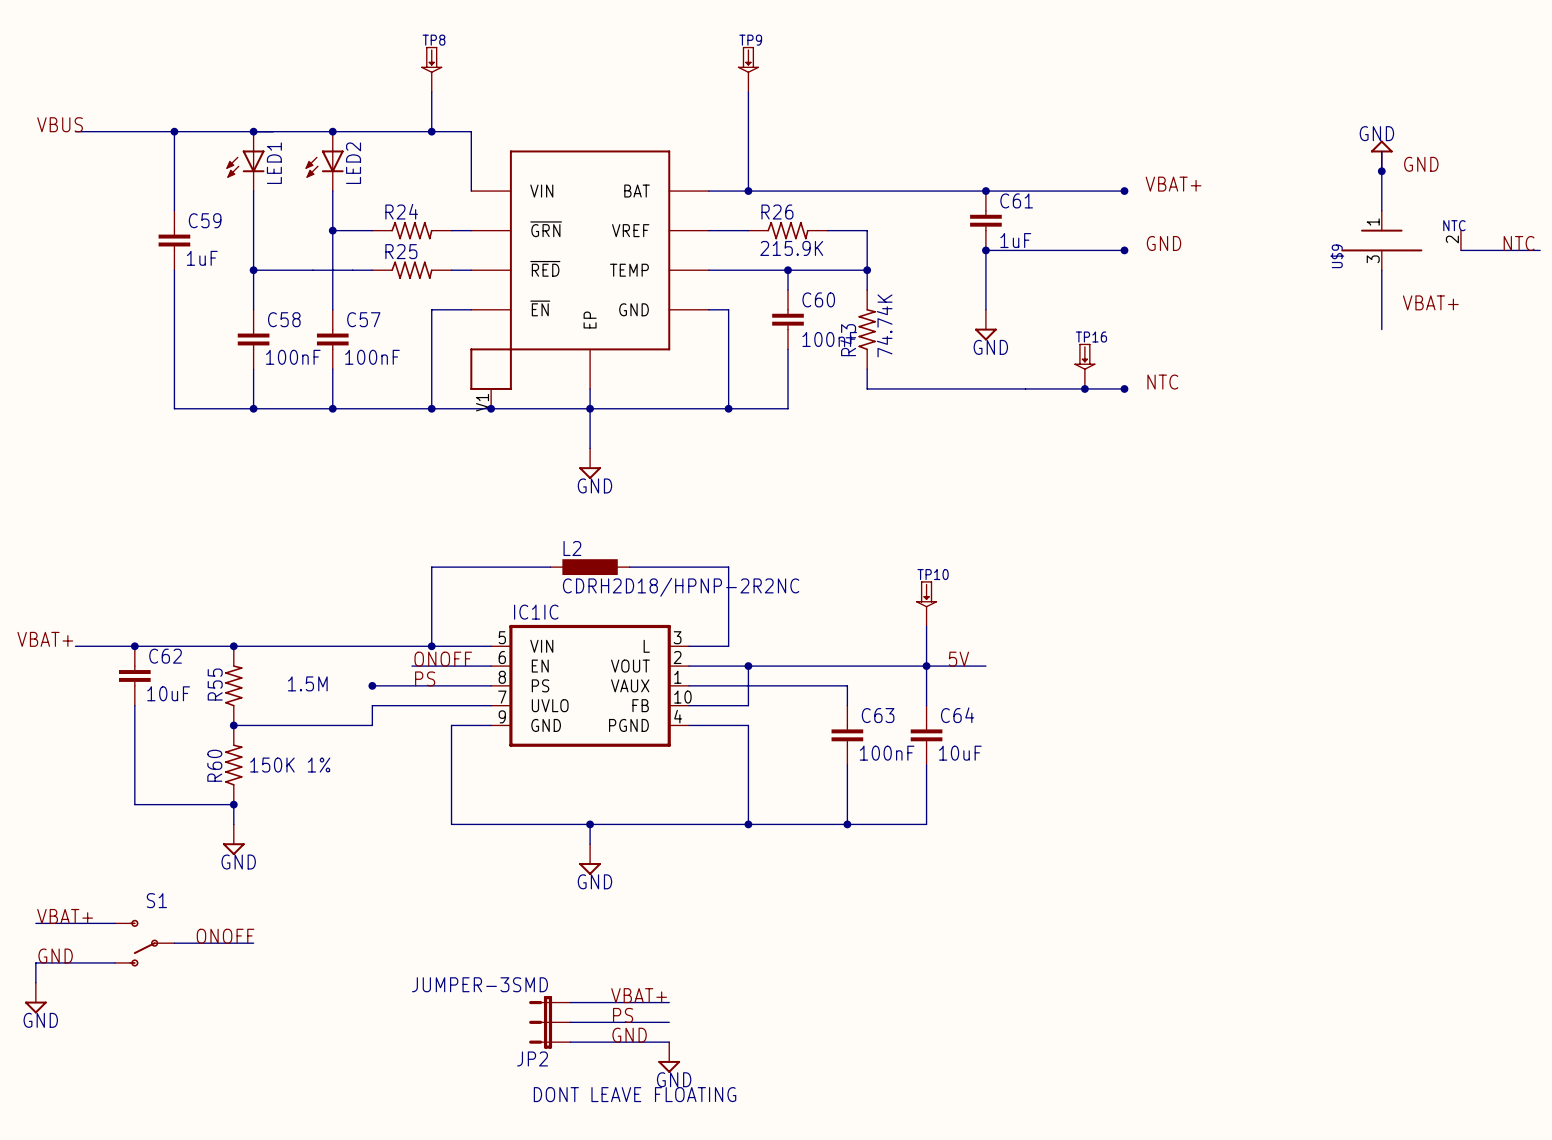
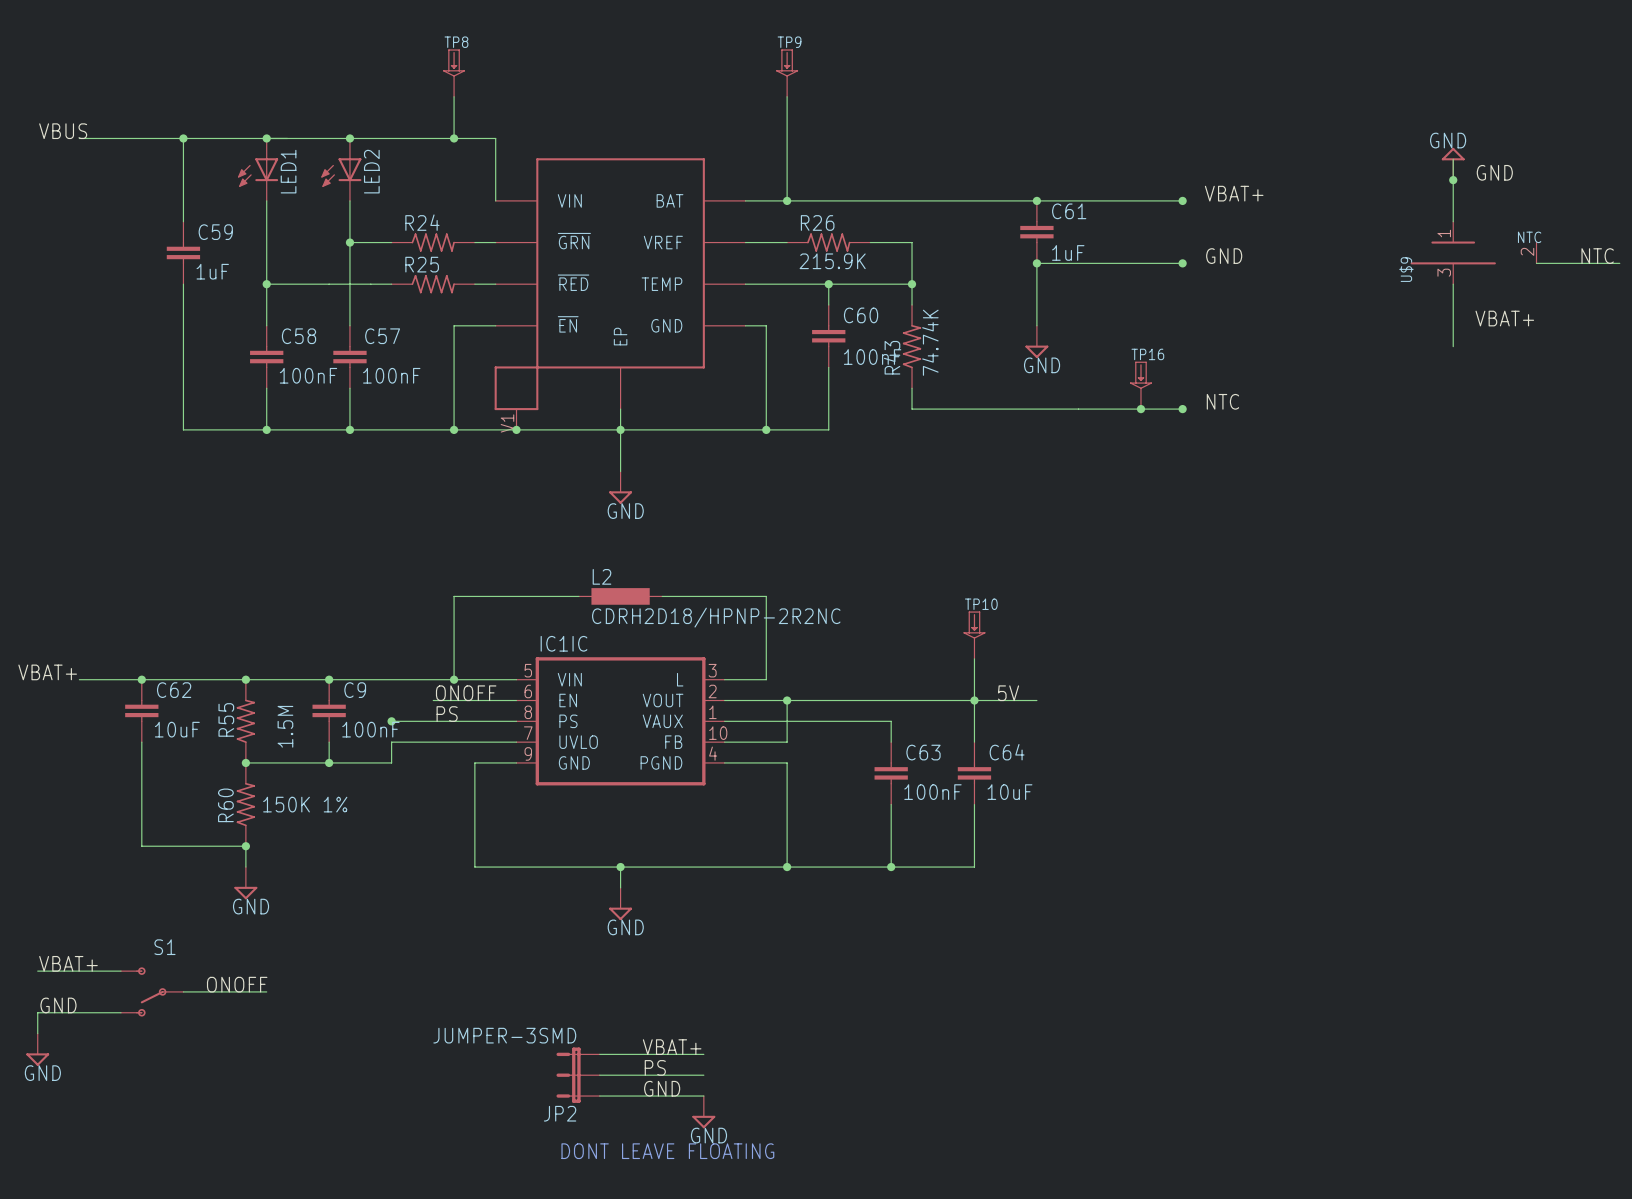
junction: none -> (329, 679)
C9: none -> 100nF (329, 710)
R55 value rotation: 0° (307, 683) -> 90° counterclockwise (285, 726)
wire: none -> (329, 742) (329, 762)
junction: none -> (329, 762)

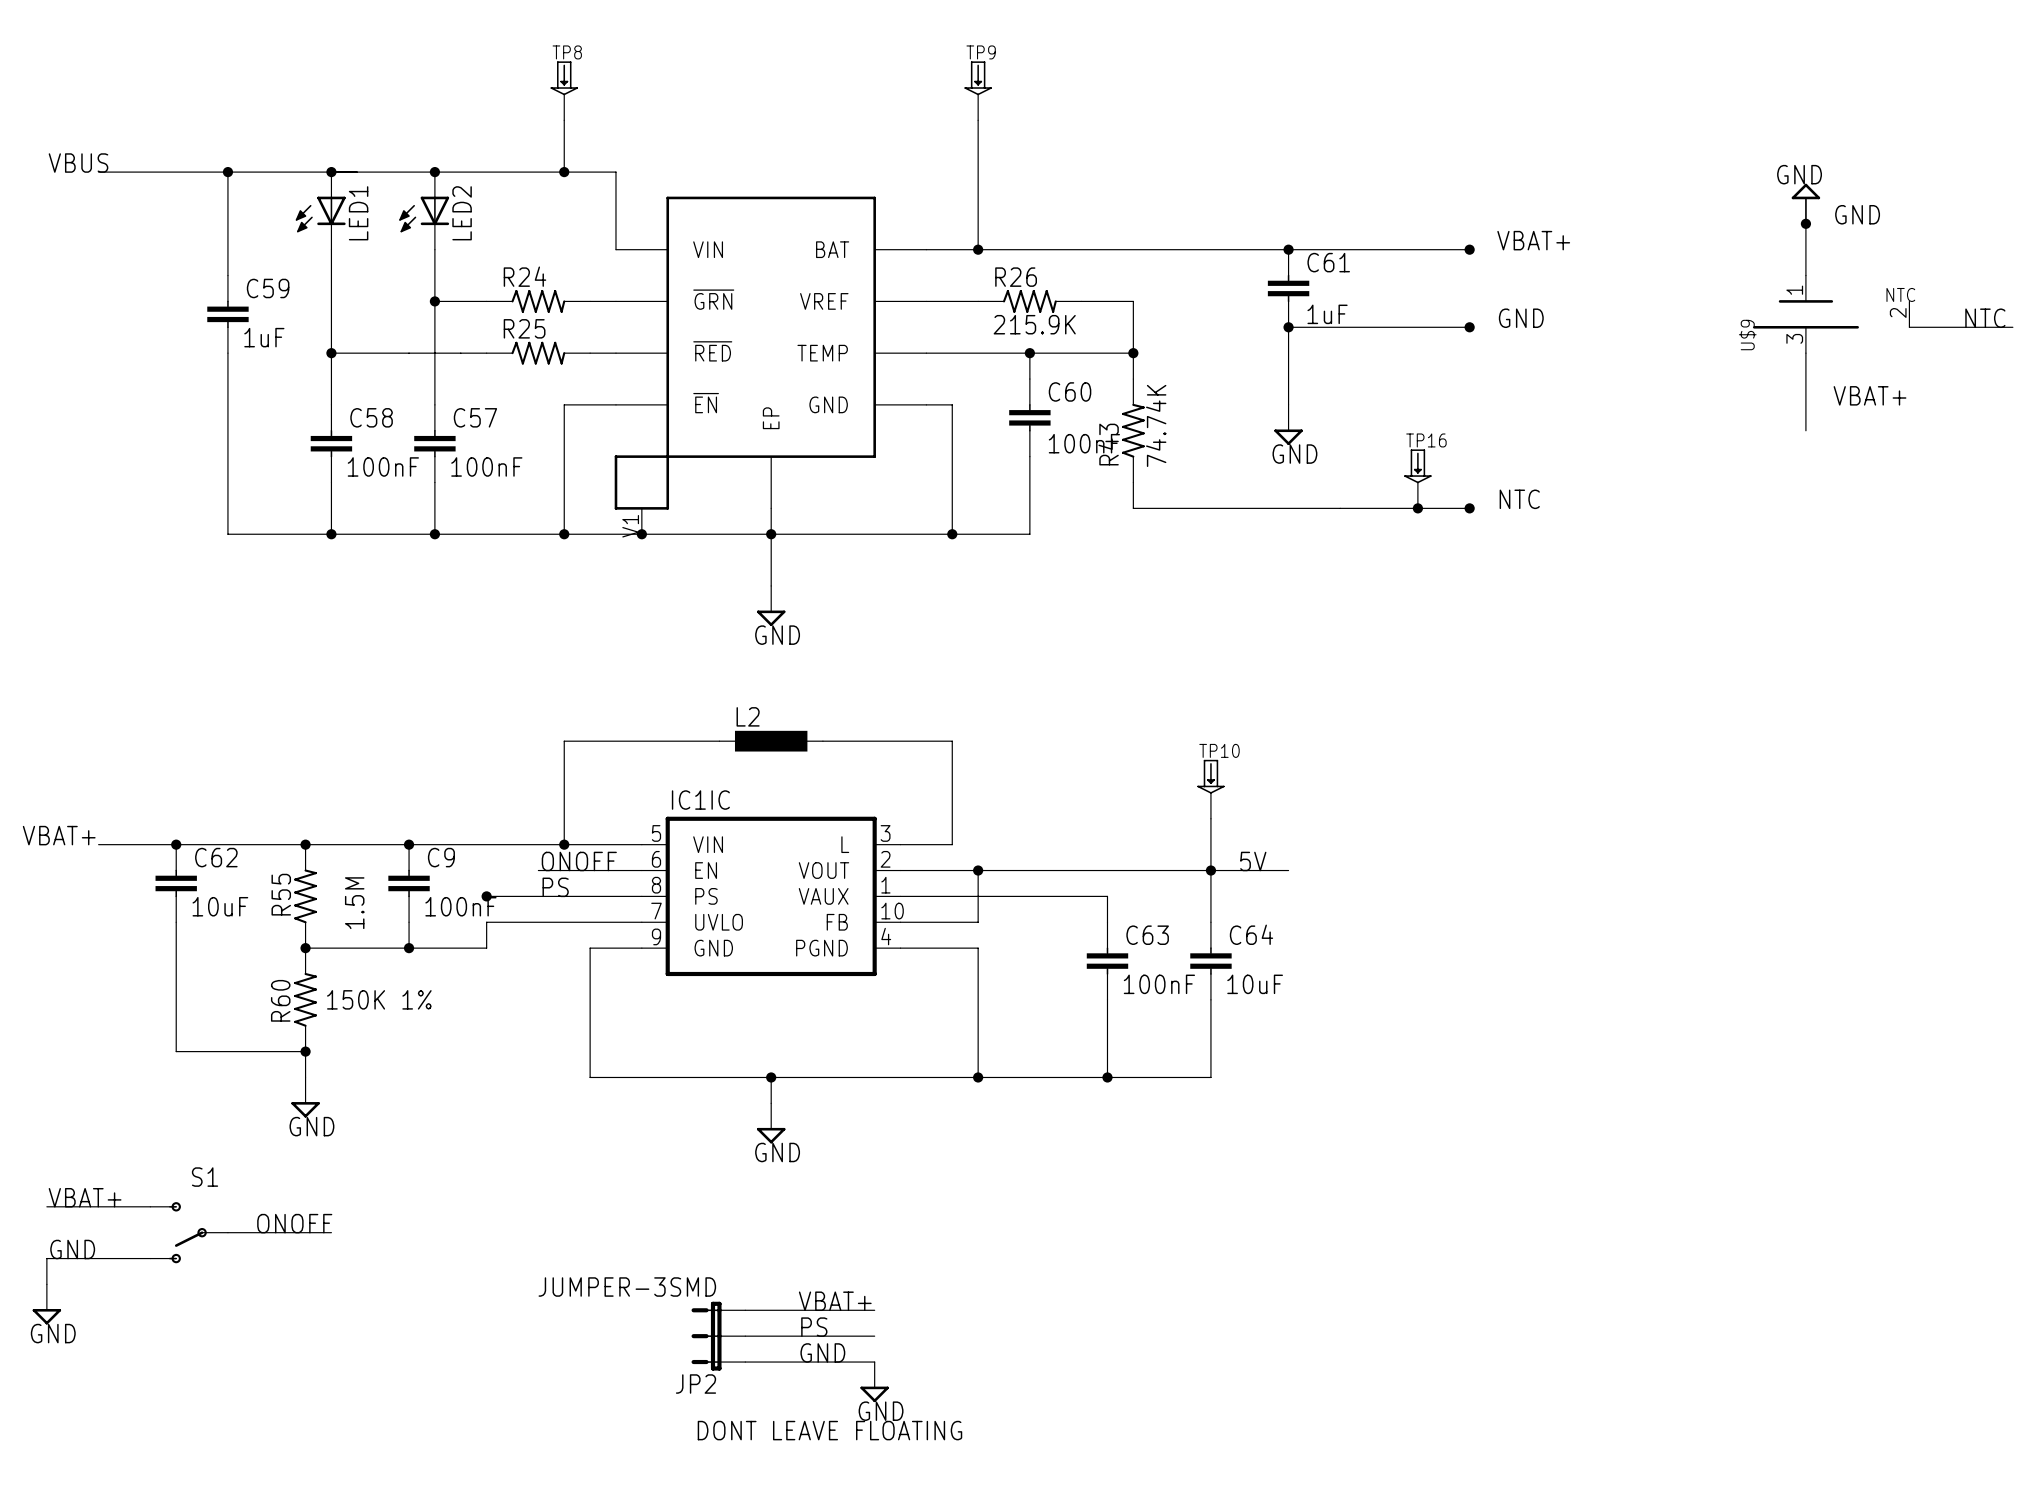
L2 value: CDRH2D18/HPNP-2R2NC (716, 617) -> none

